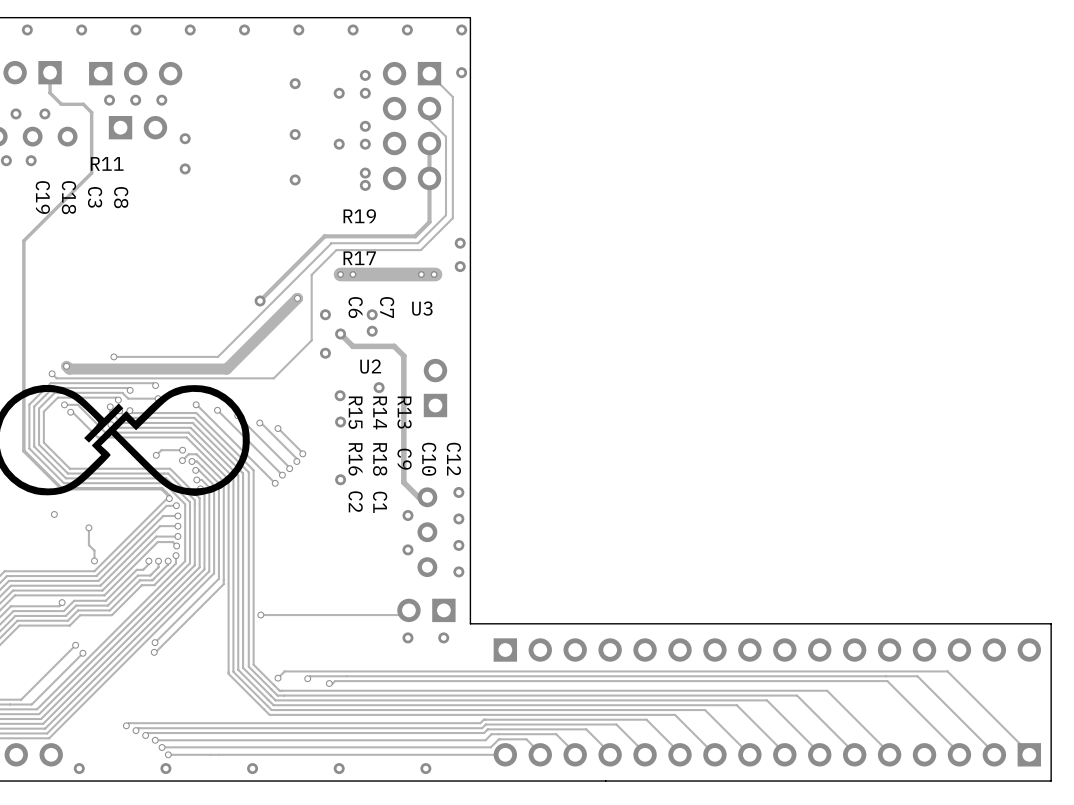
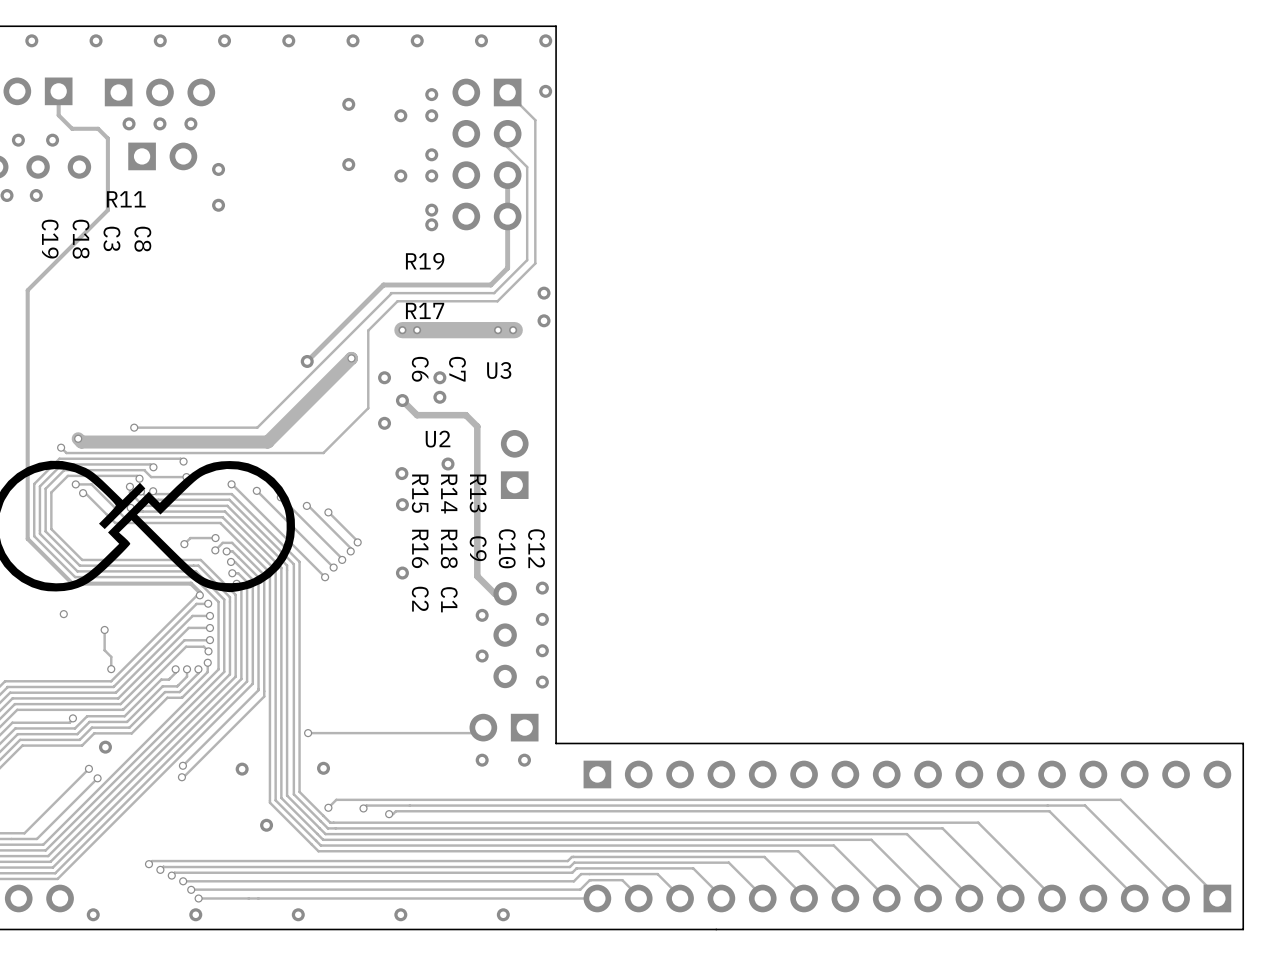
via: (295, 179) -> none
via: none -> (105, 747)
via: none -> (323, 768)
via: none -> (242, 769)
via: none -> (266, 825)

